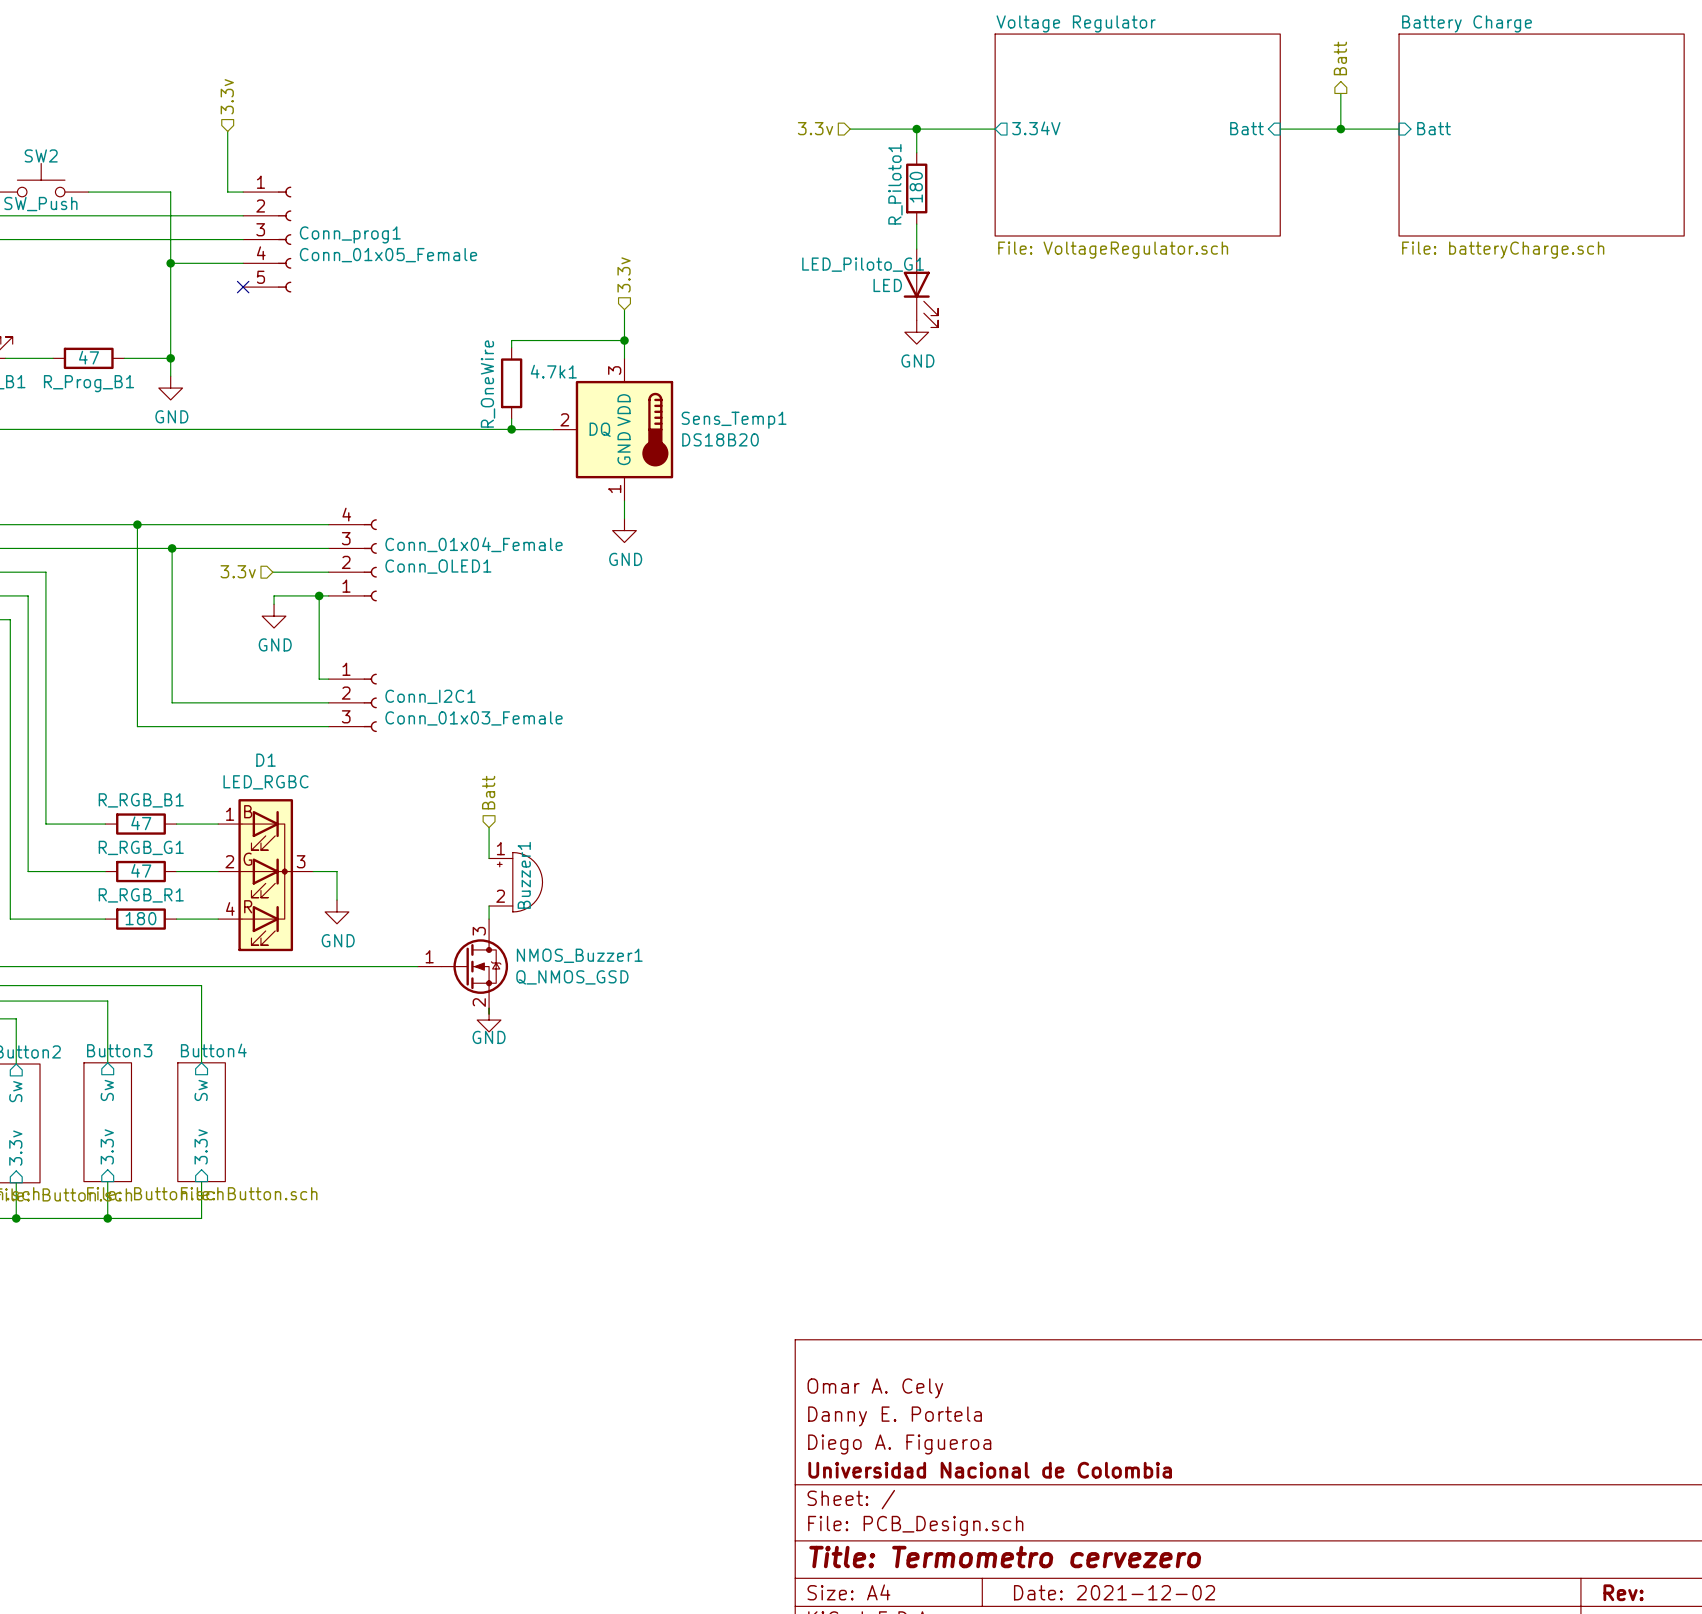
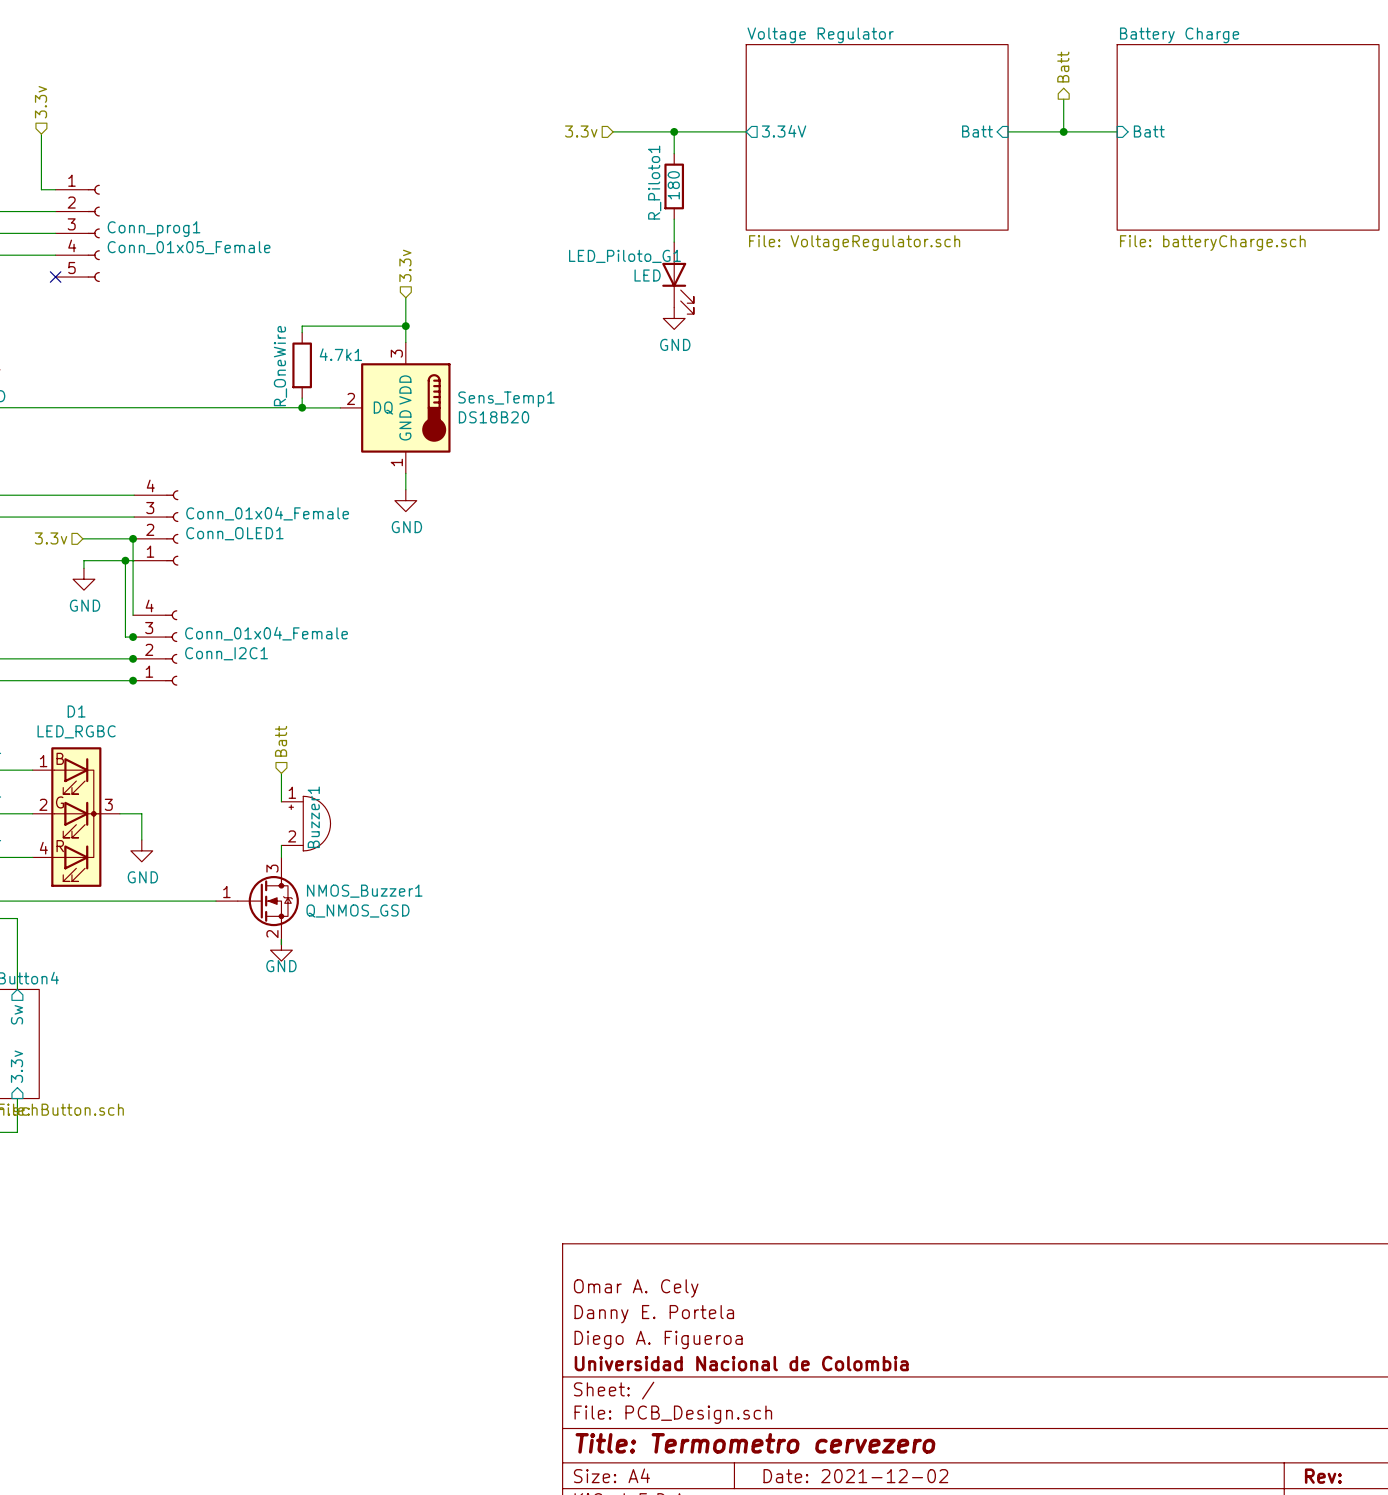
wire: none -> (133, 538) (133, 615)
junction: none -> (133, 538)
Conn_I2C1 symbol: [328, 673, 377, 733] -> [133, 610, 178, 686]
junction: none -> (133, 637)
junction: none -> (133, 658)
Conn_I2C1 value: Conn_01x03_Female (474, 718) -> Conn_01x04_Female (266, 633)
junction: none -> (133, 680)

